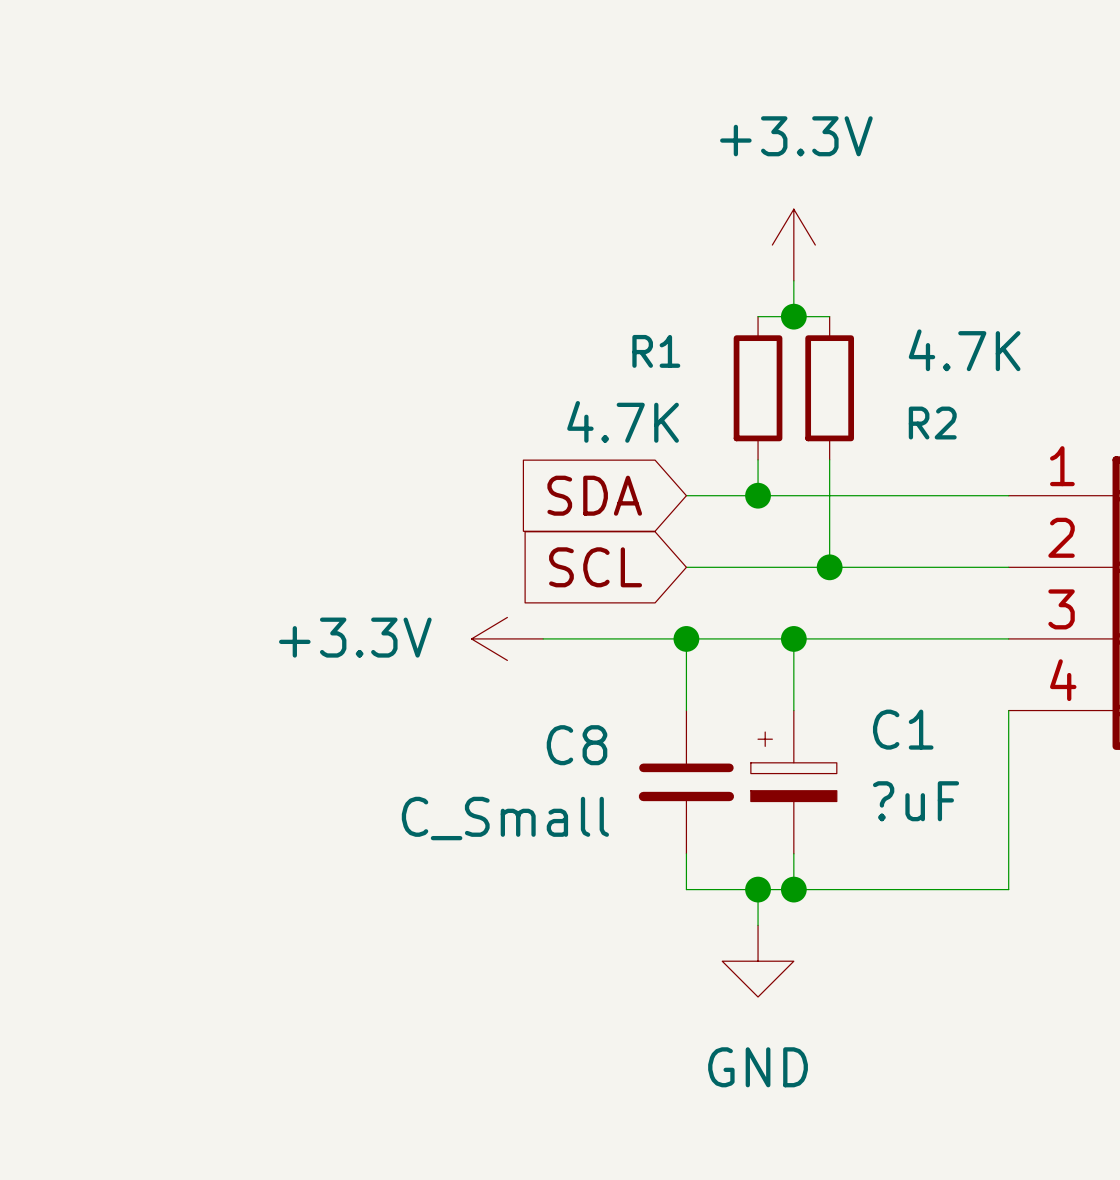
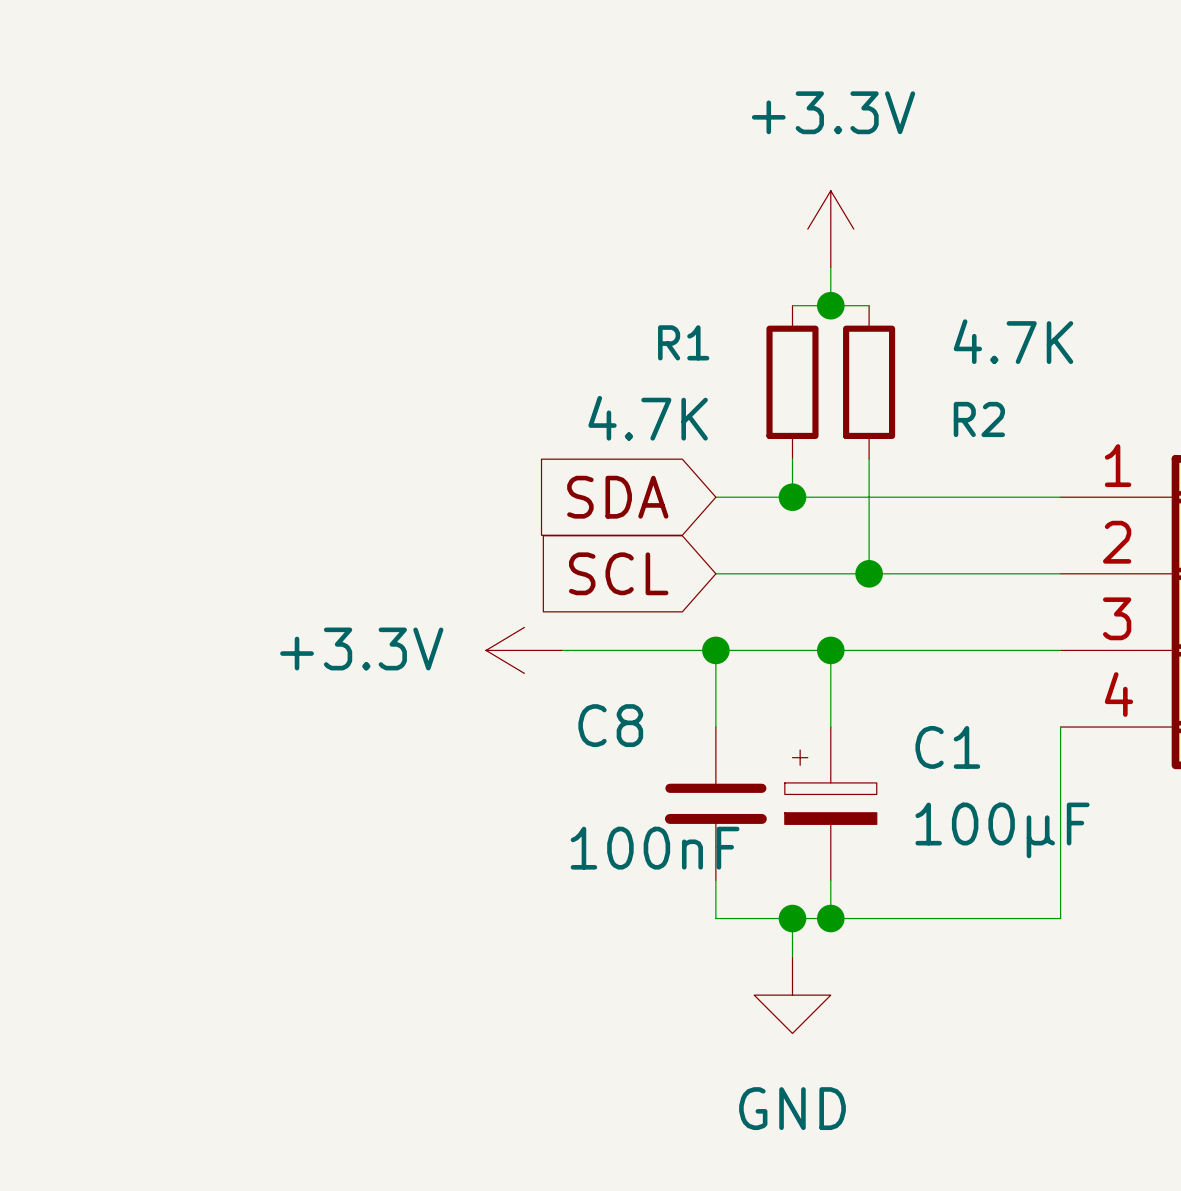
C8 name position: C8 (577, 745) -> C8 (610, 725)
C1 value: ?uF (916, 801) -> 100µF (1002, 830)
C8 value: C_Small (505, 818) -> 100nF (655, 848)

